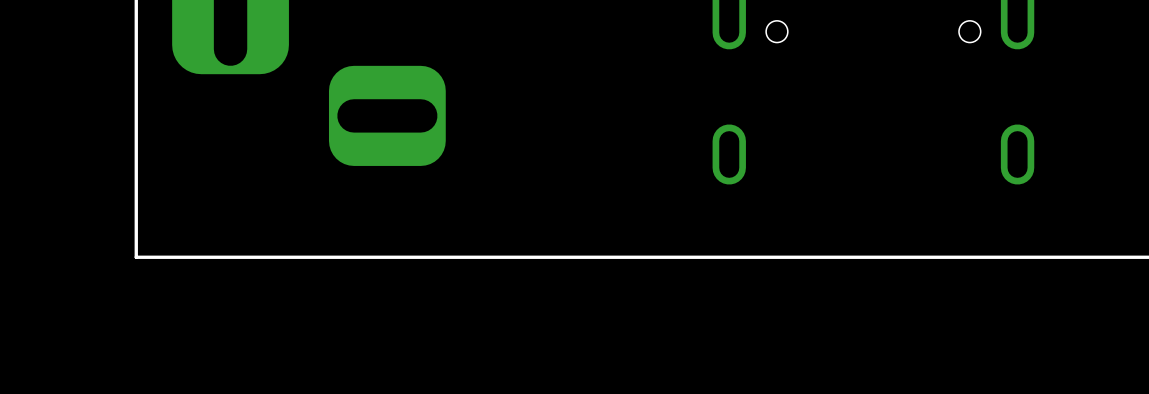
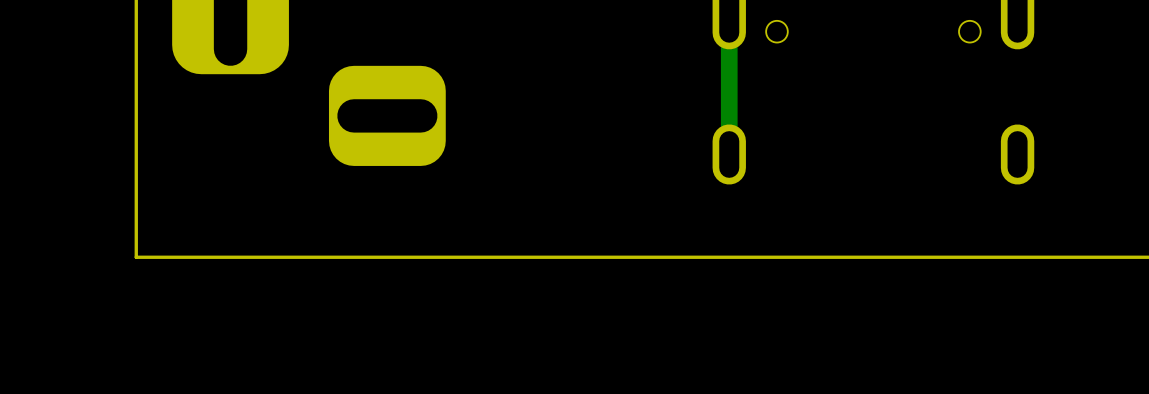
track: none -> (729, 14) (729, 154)

